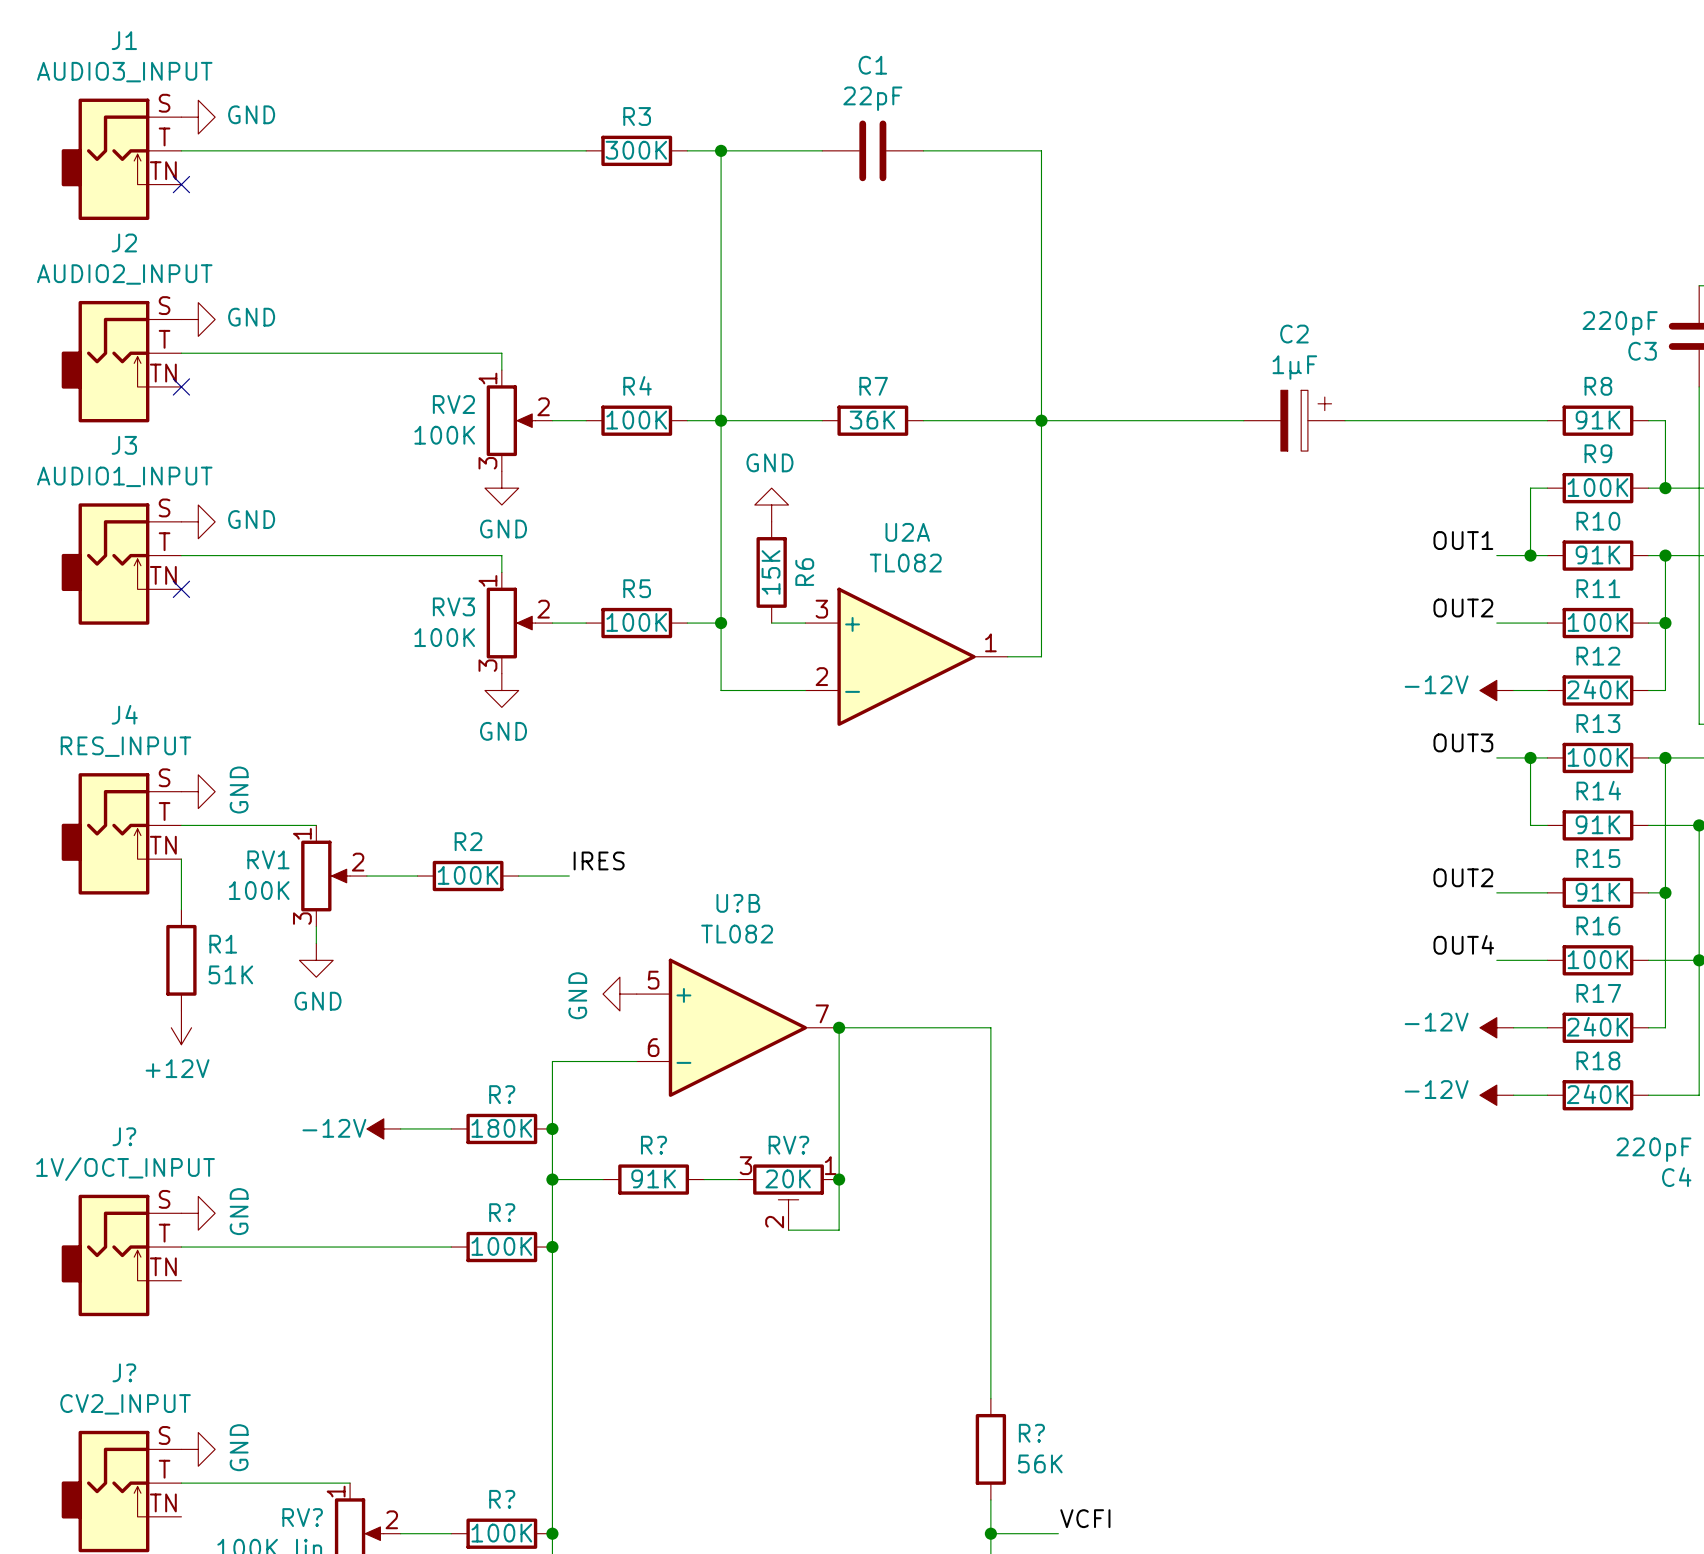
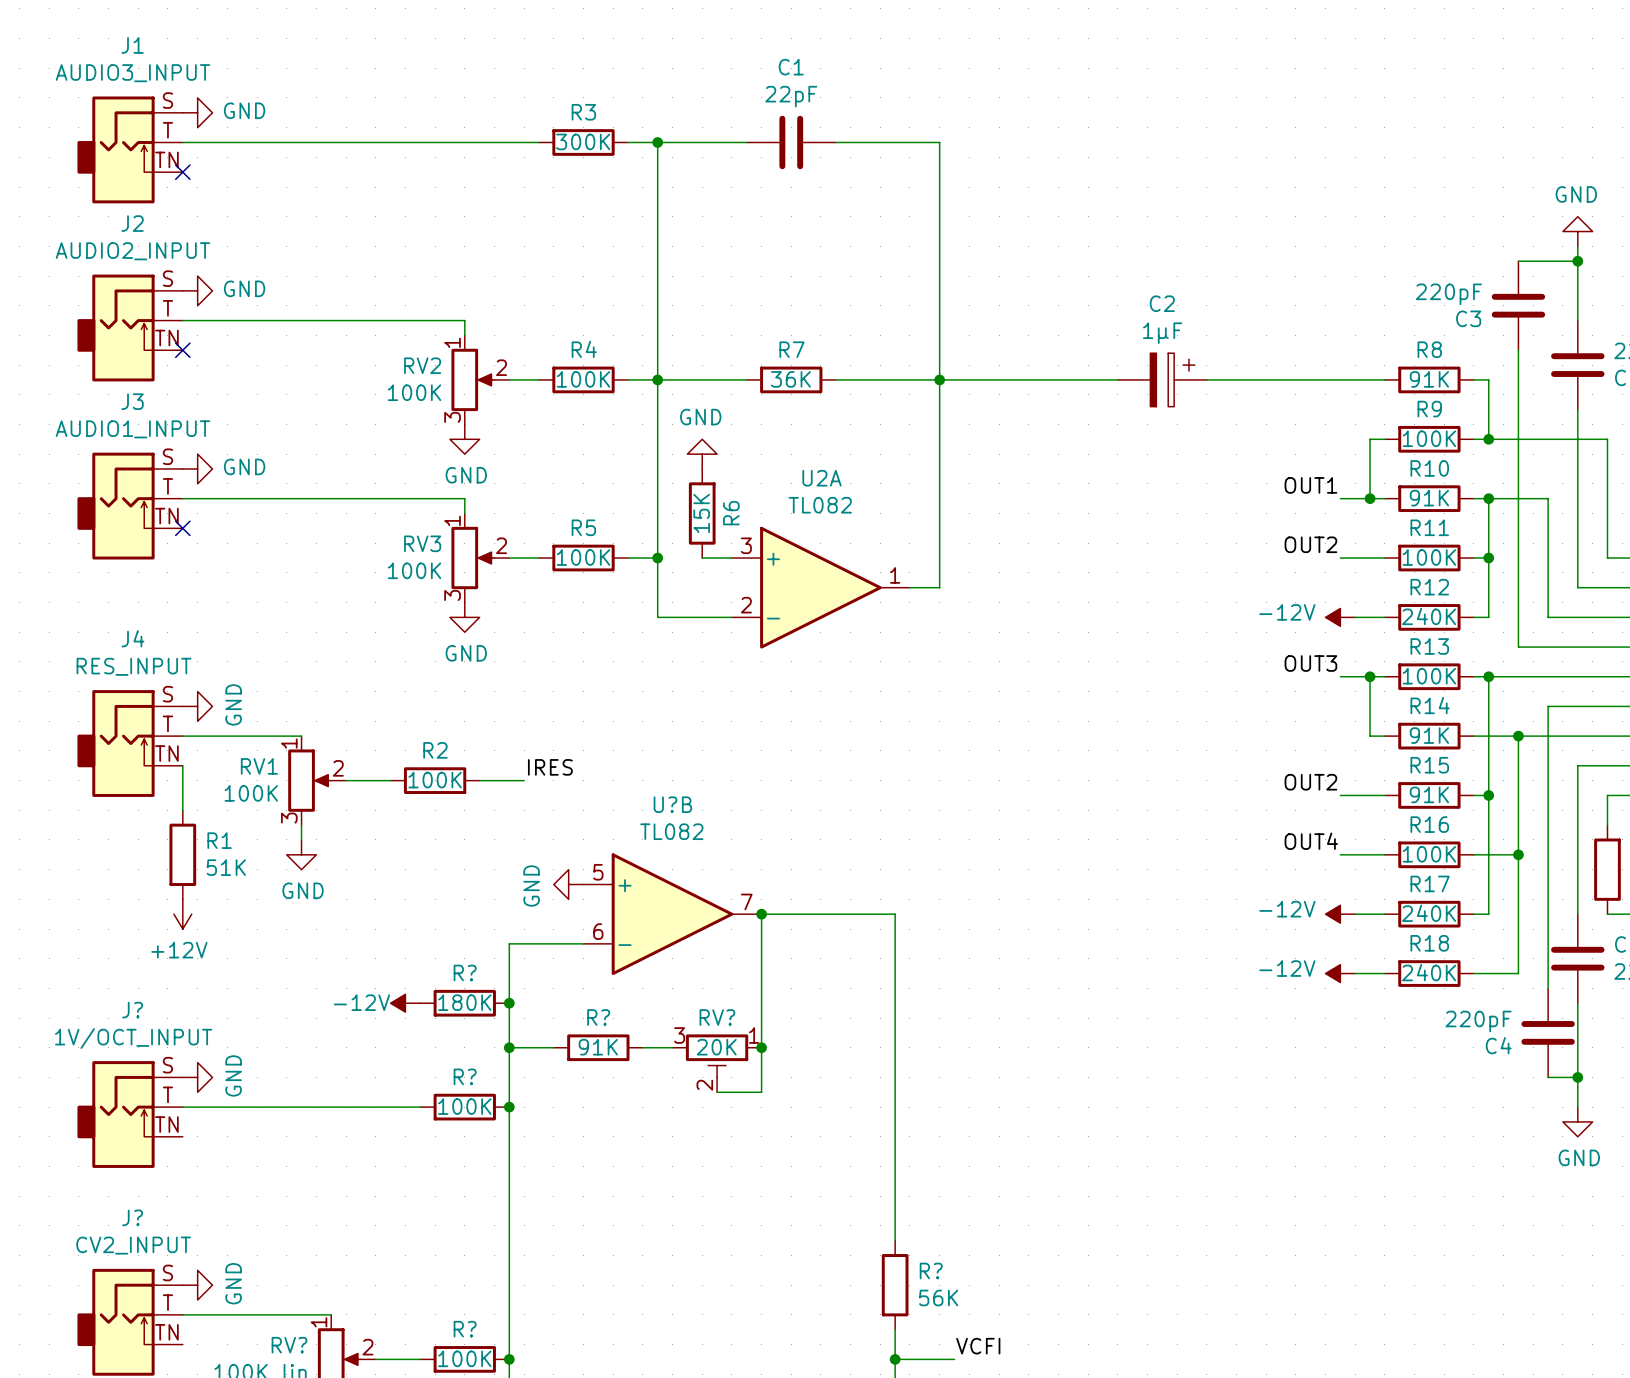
power symbol position: -12V (383, 1128) -> -12V (405, 1003)

